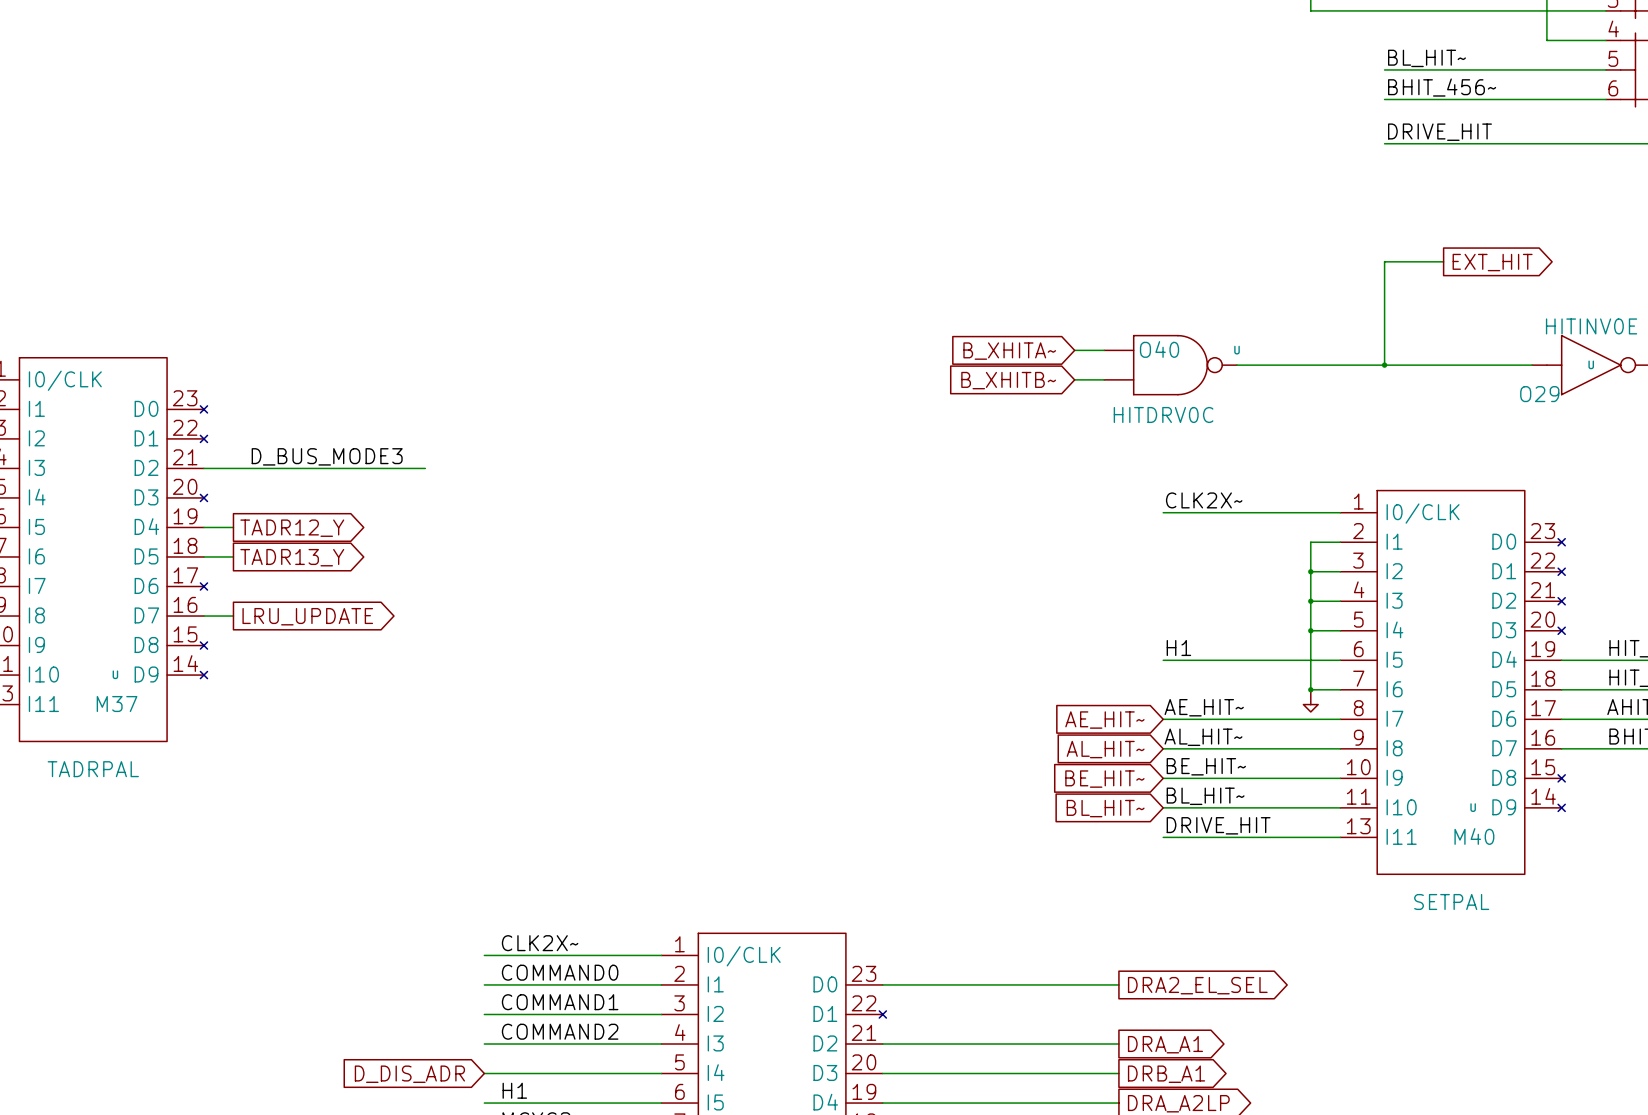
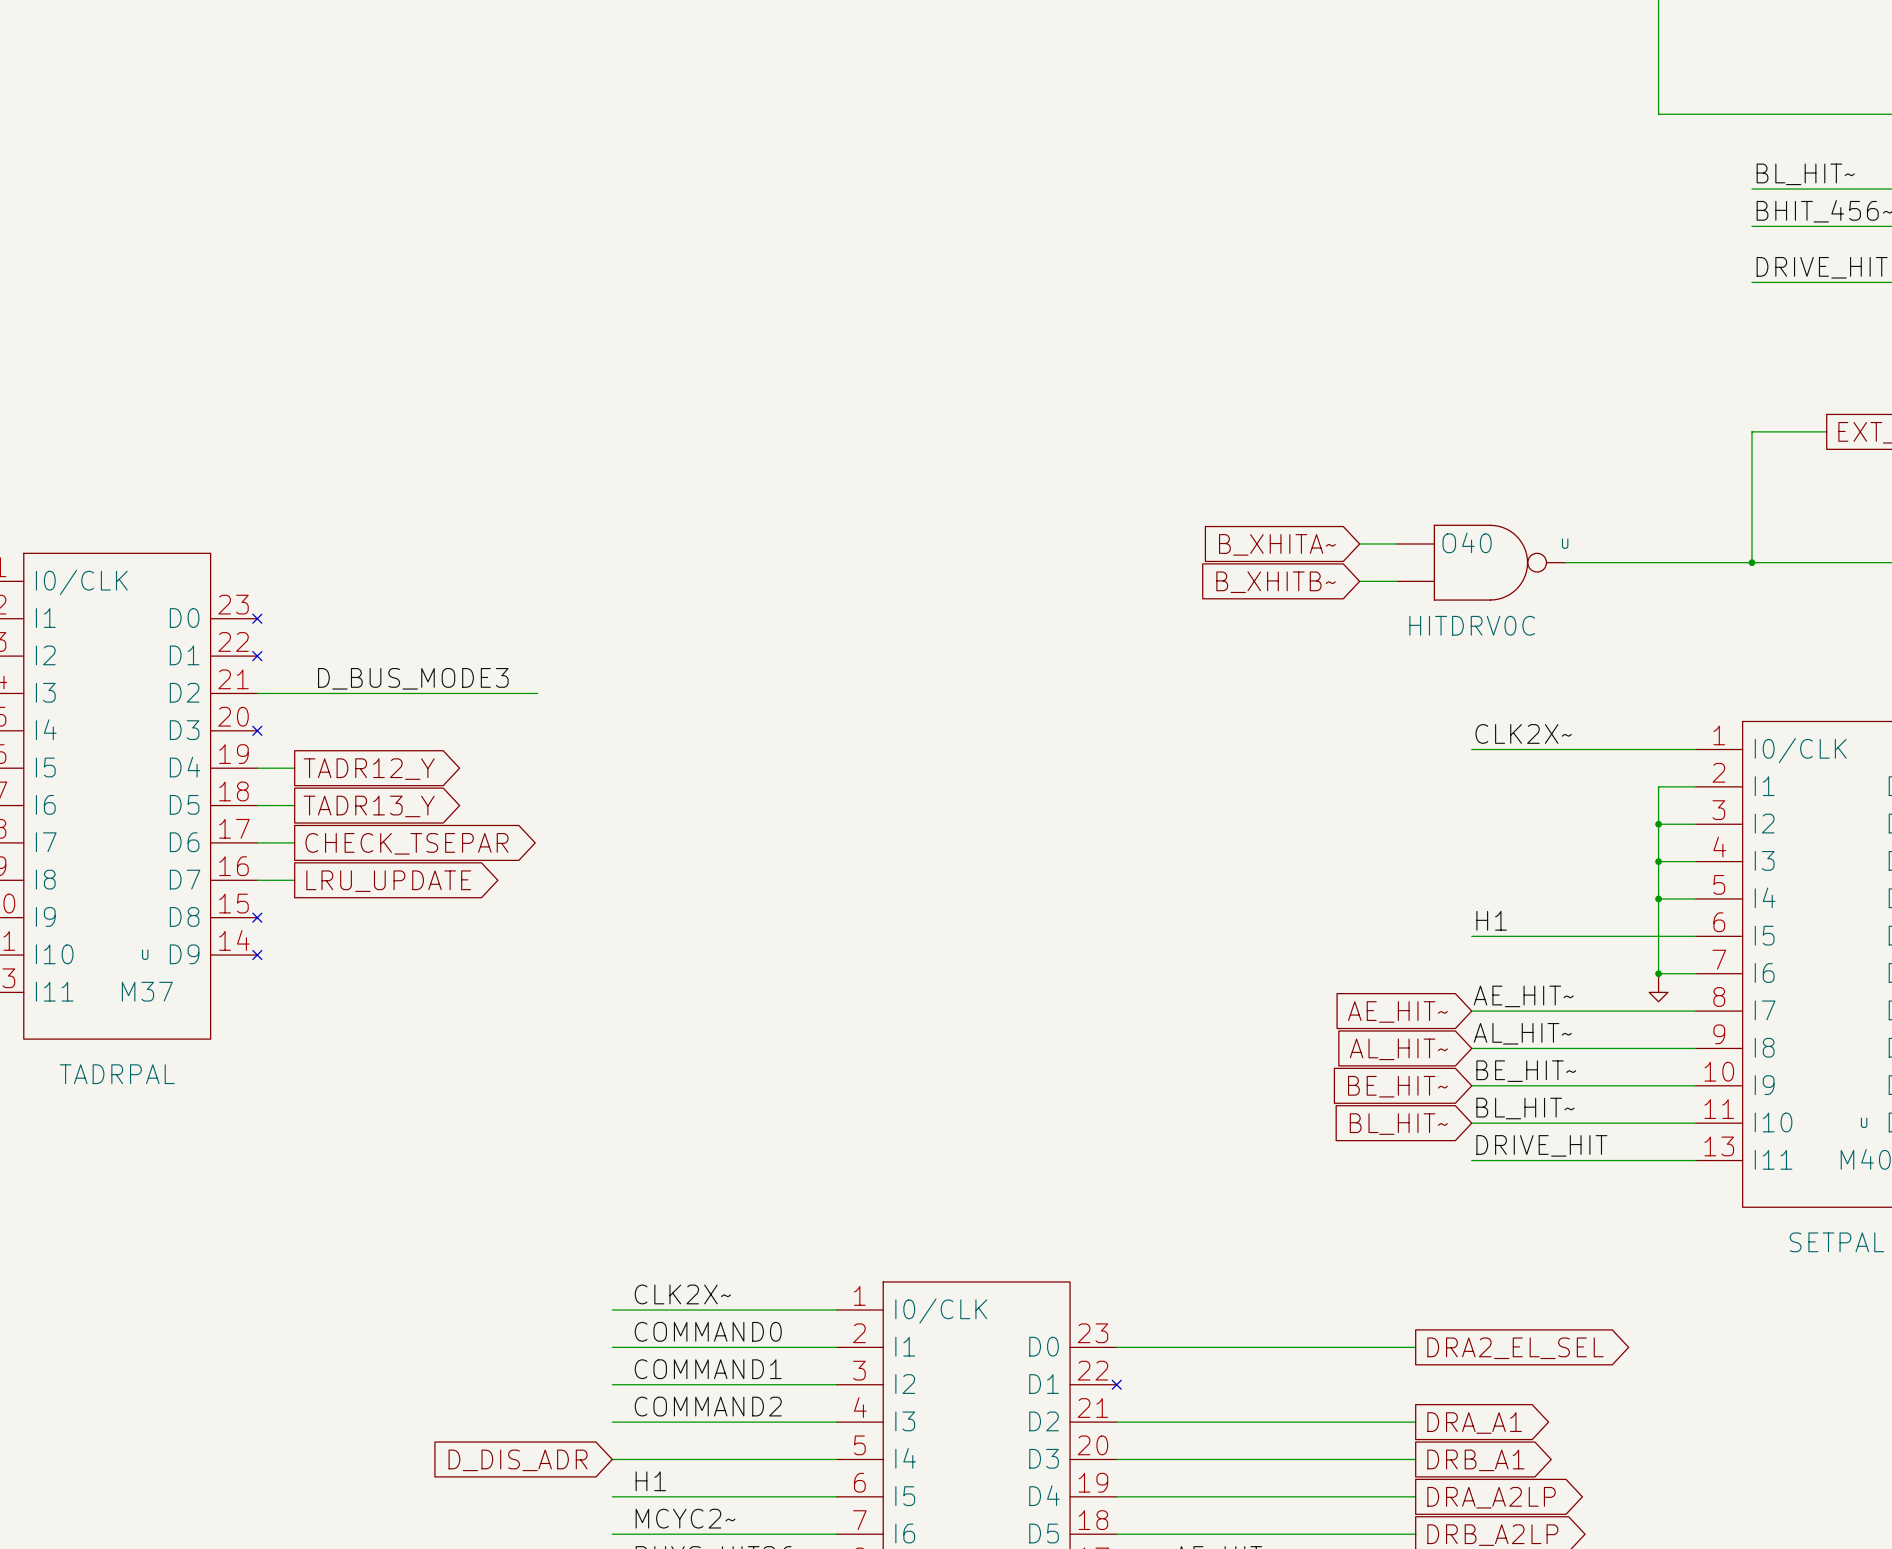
wire: none -> (257, 842) (294, 842)
no-connect mark: (203, 586) -> none
global label: none -> CHECK_TSEPAR (406, 843)

